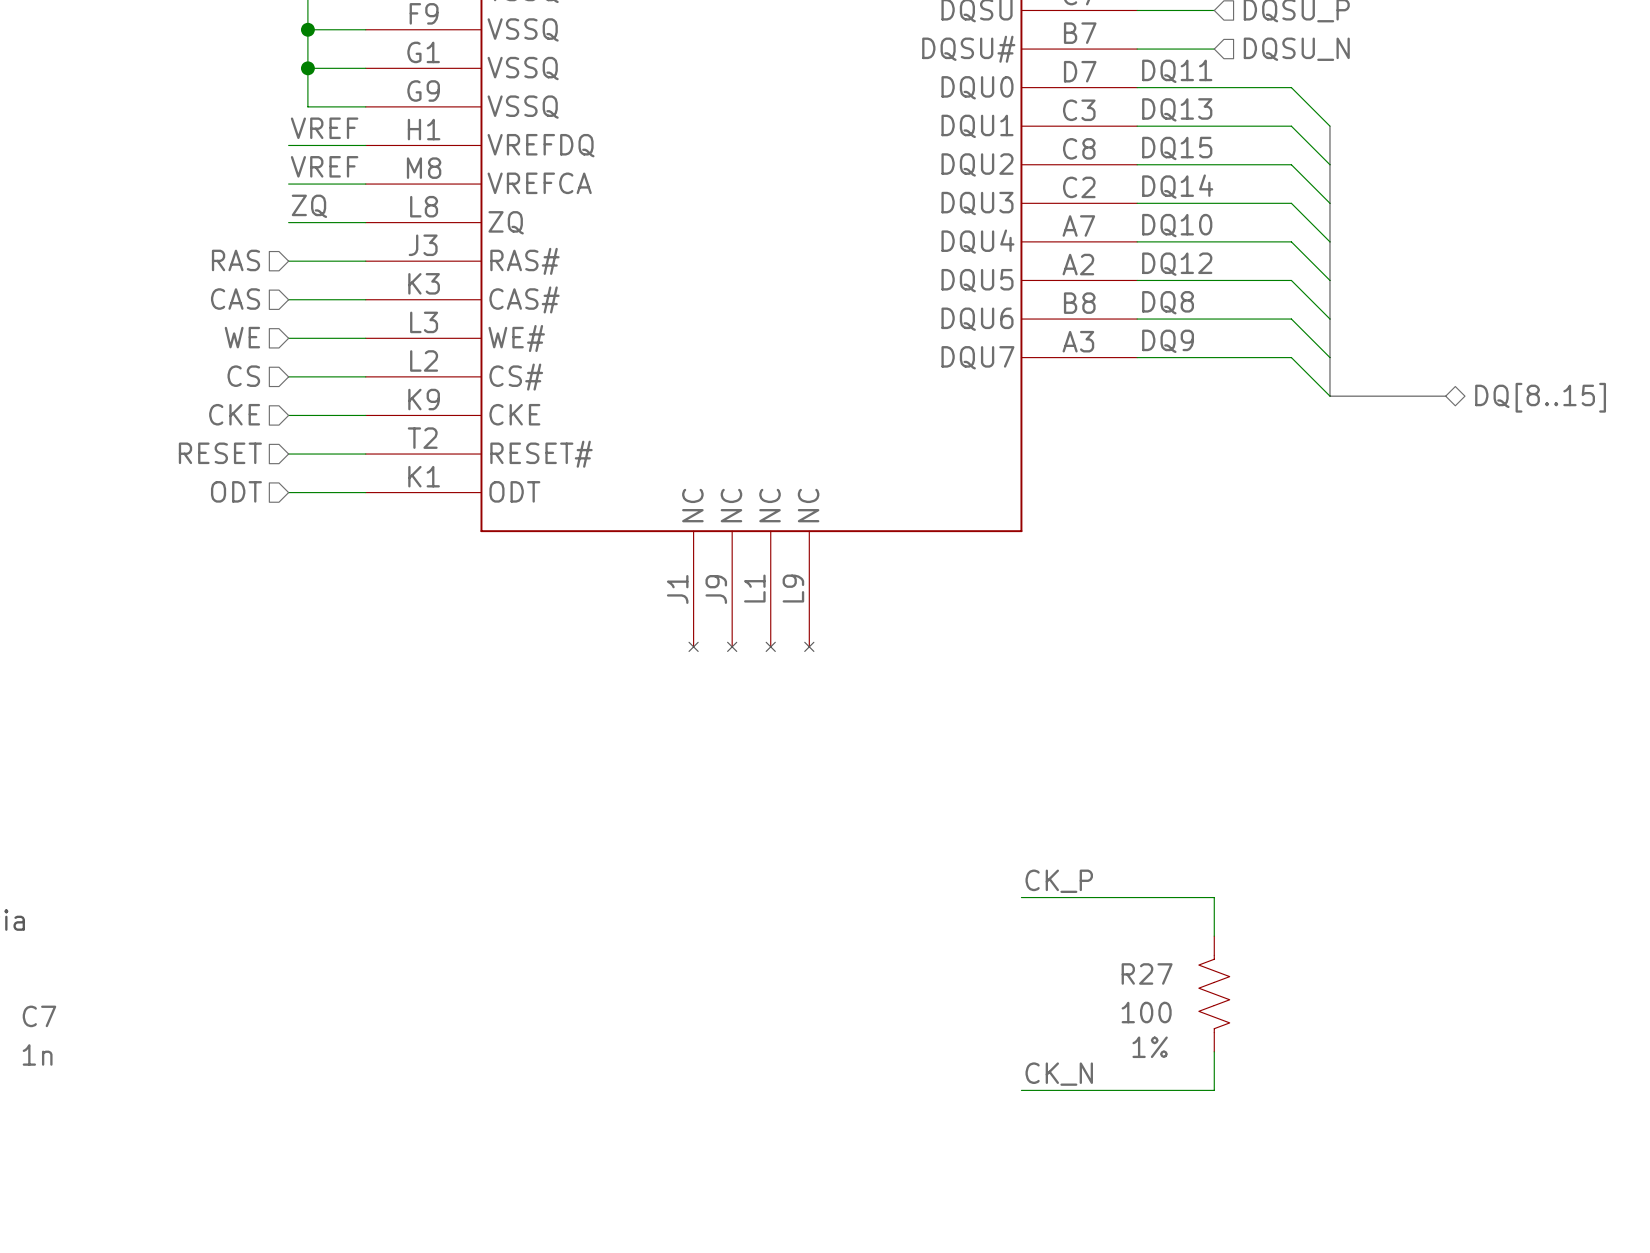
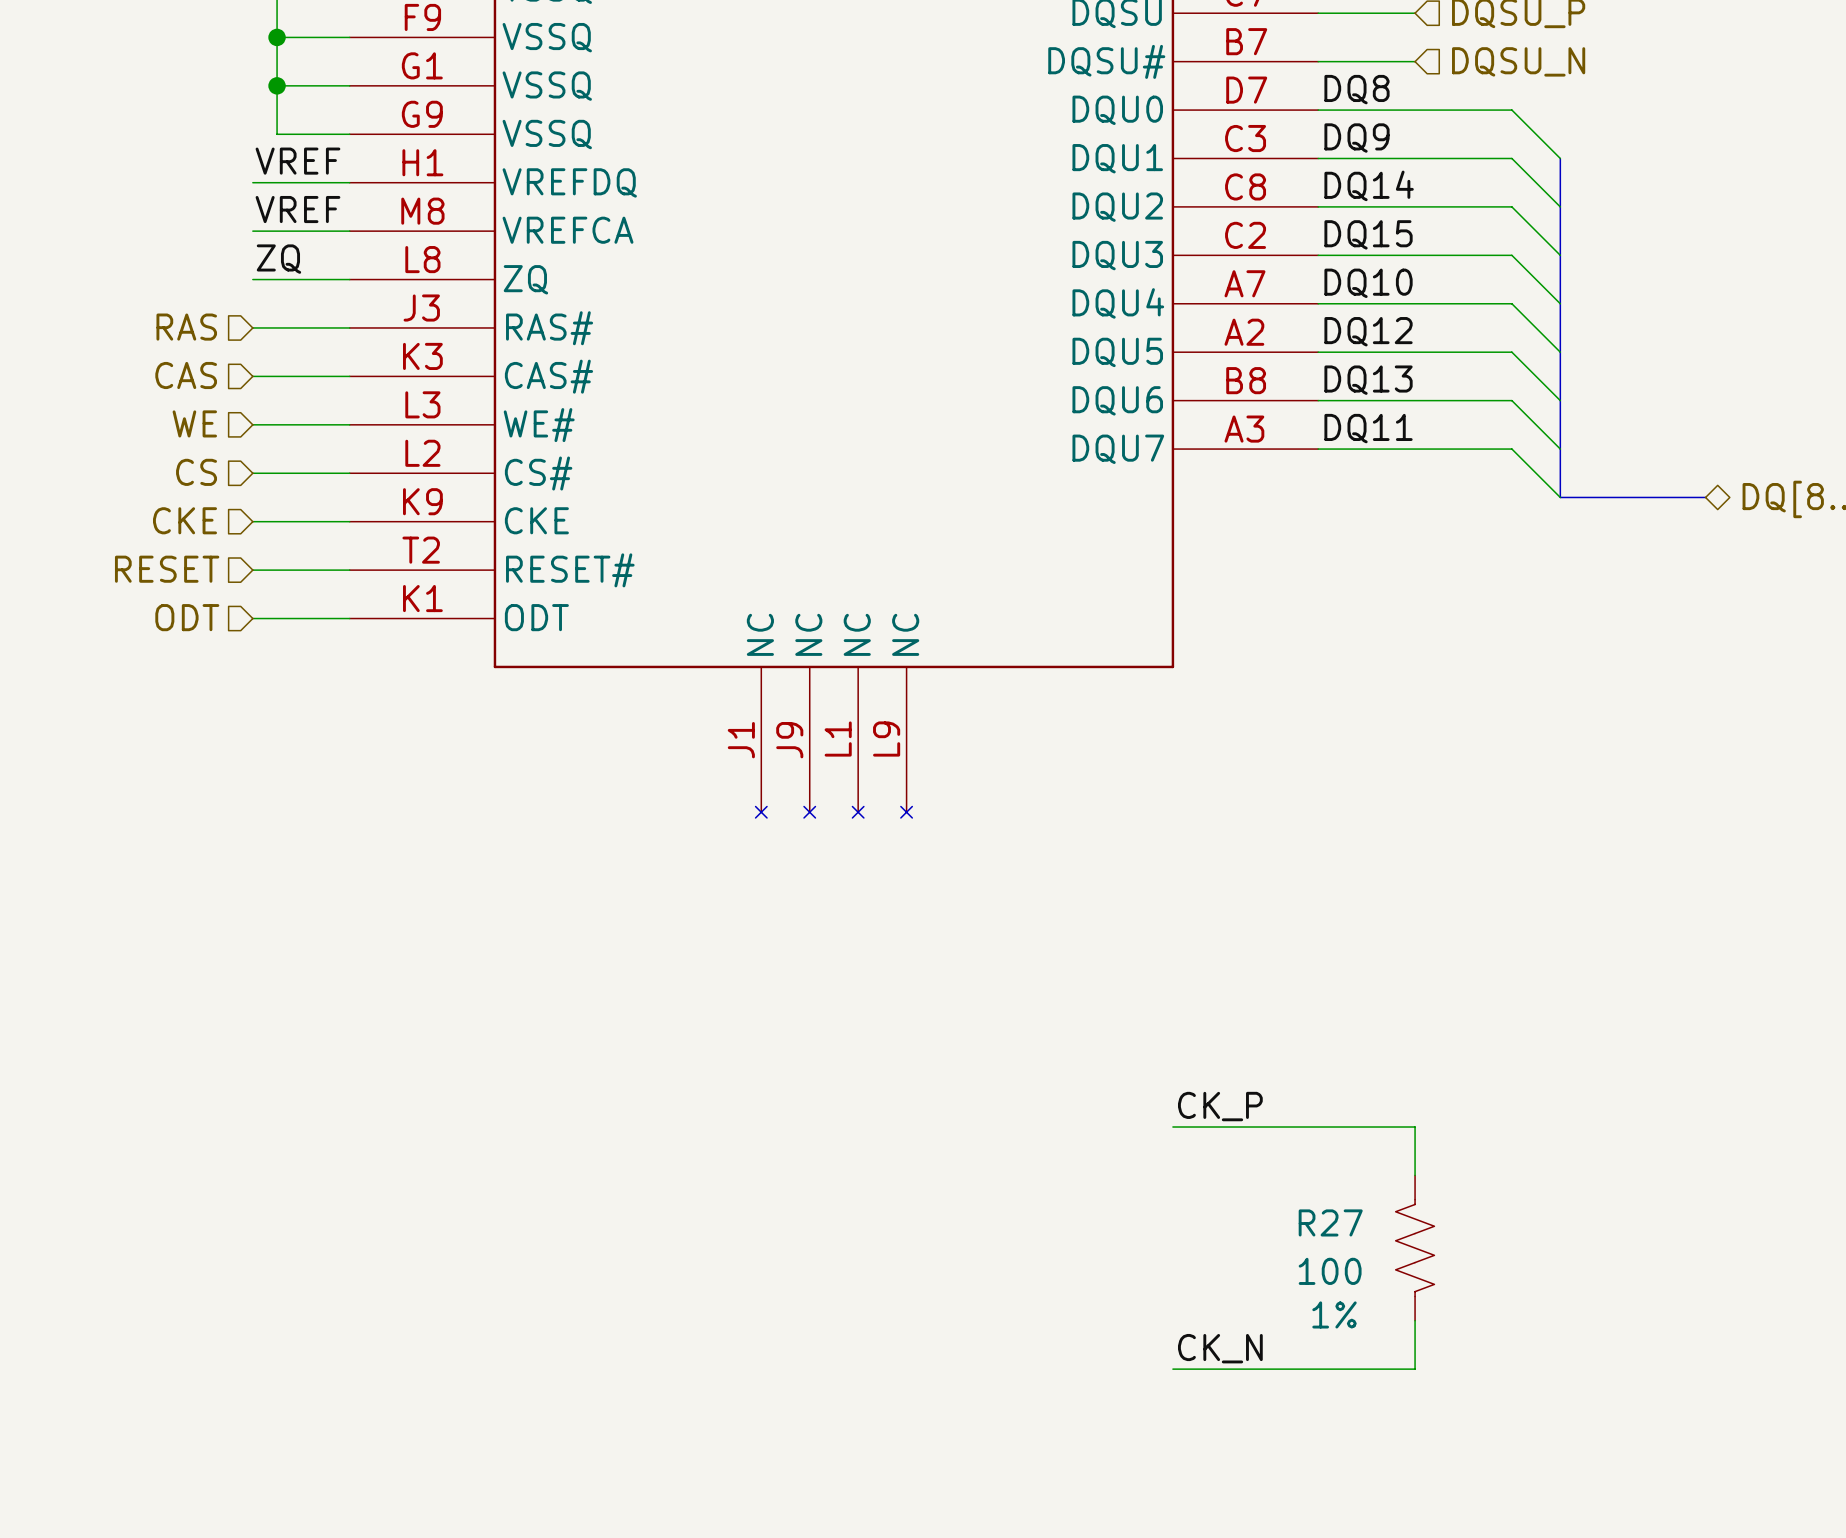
label: DQ11 (1177, 71) -> DQ8 (1357, 89)
label: DQ13 (1177, 109) -> DQ9 (1357, 138)
label: DQ15 (1177, 148) -> DQ14 (1369, 185)
label: DQ14 (1177, 186) -> DQ15 (1368, 234)
label: DQ8 (1168, 302) -> DQ13 (1368, 380)
label: DQ9 (1168, 341) -> DQ11 (1368, 428)

